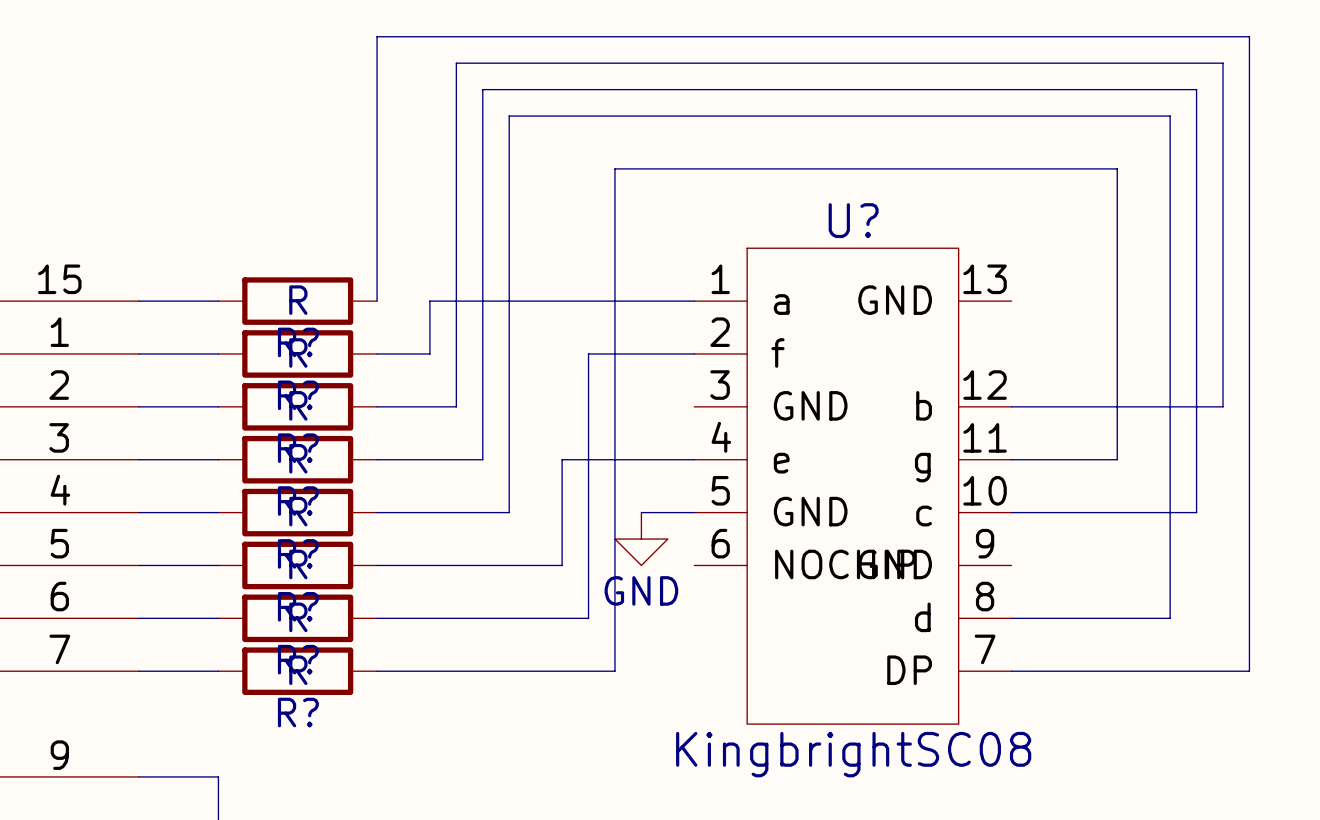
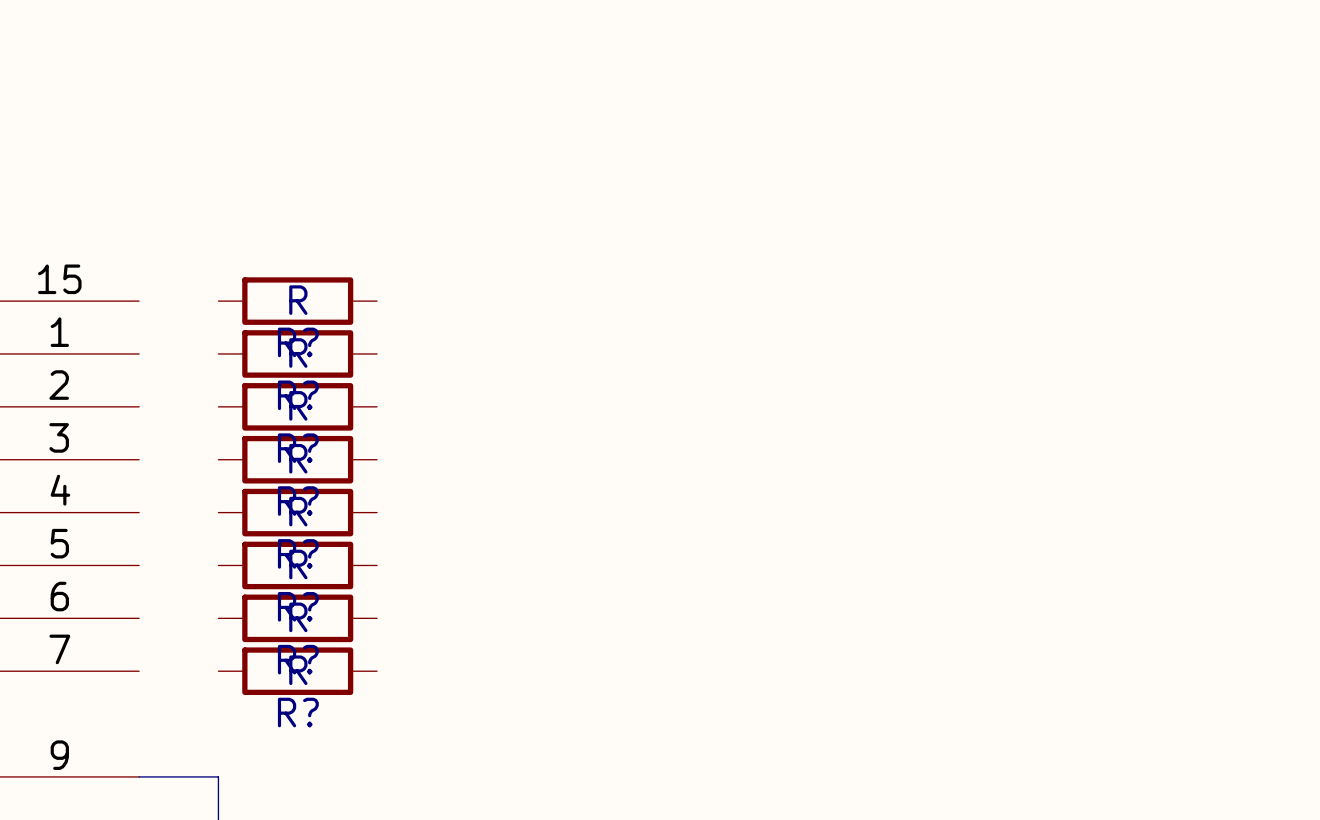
wire: (139, 301) (218, 301) -> none
wire: (377, 301) (377, 36) (1249, 36) (1249, 671) (1011, 671) -> none
wire: (694, 301) (429, 301) (429, 353) (377, 353) -> none
wire: (139, 353) (218, 353) -> none
wire: (694, 353) (588, 353) (588, 618) (377, 618) -> none
wire: (139, 406) (218, 406) -> none
wire: (377, 406) (456, 406) (456, 63) (1223, 63) (1223, 406) (1011, 406) -> none
wire: (139, 459) (218, 459) -> none
wire: (377, 459) (482, 459) (482, 89) (1196, 89) (1196, 512) (1011, 512) -> none
wire: (694, 459) (562, 459) (562, 565) (377, 565) -> none
wire: (1011, 459) (1117, 459) (1117, 168) (614, 168) (614, 671) (377, 671) -> none
U?: KingbrightSC08 (852, 486) -> none
wire: (139, 512) (218, 512) -> none
wire: (377, 512) (509, 512) (509, 116) (1170, 116) (1170, 618) (1011, 618) -> none
wire: (641, 512) (694, 512) -> none
power symbol: GND (641, 539) -> none
wire: (139, 565) (218, 565) -> none
wire: (139, 618) (218, 618) -> none
wire: (139, 671) (218, 671) -> none

